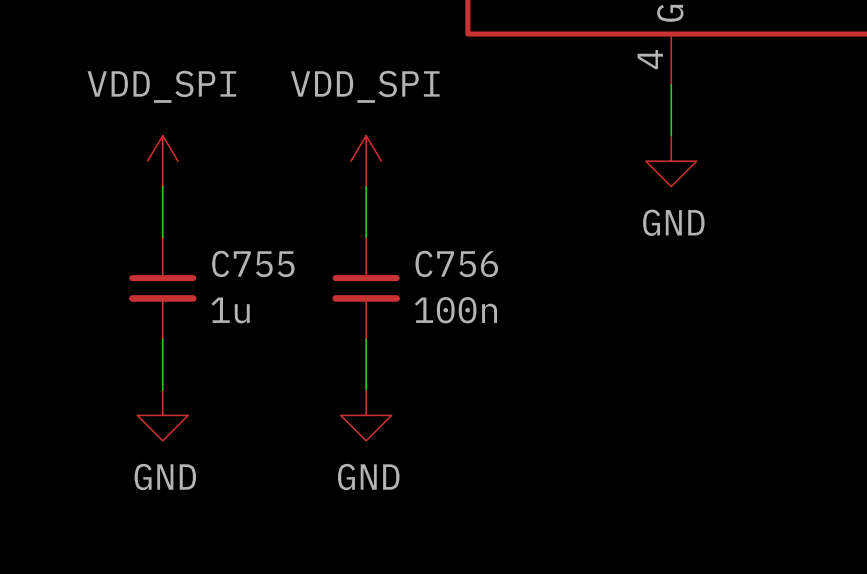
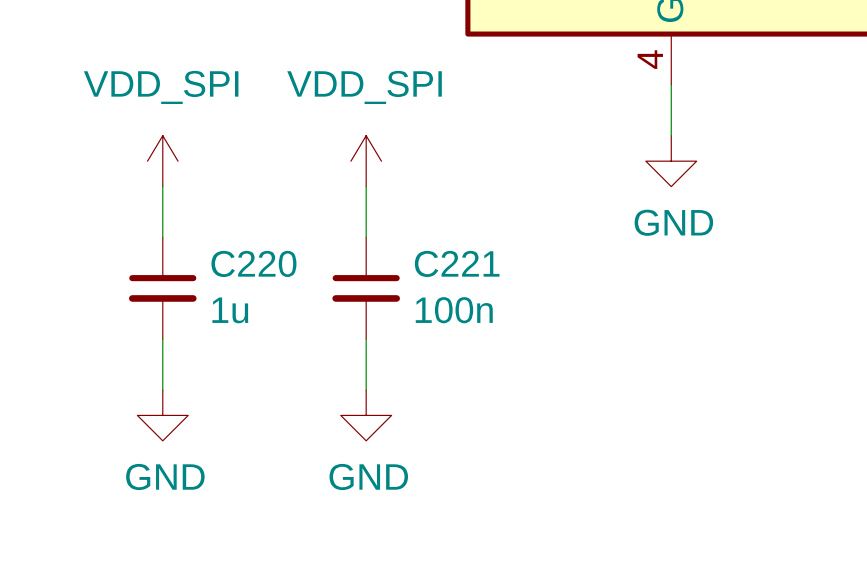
C755 name: C755 (253, 263) -> C220 (253, 263)
C756 name: C756 (456, 263) -> C221 (457, 263)

